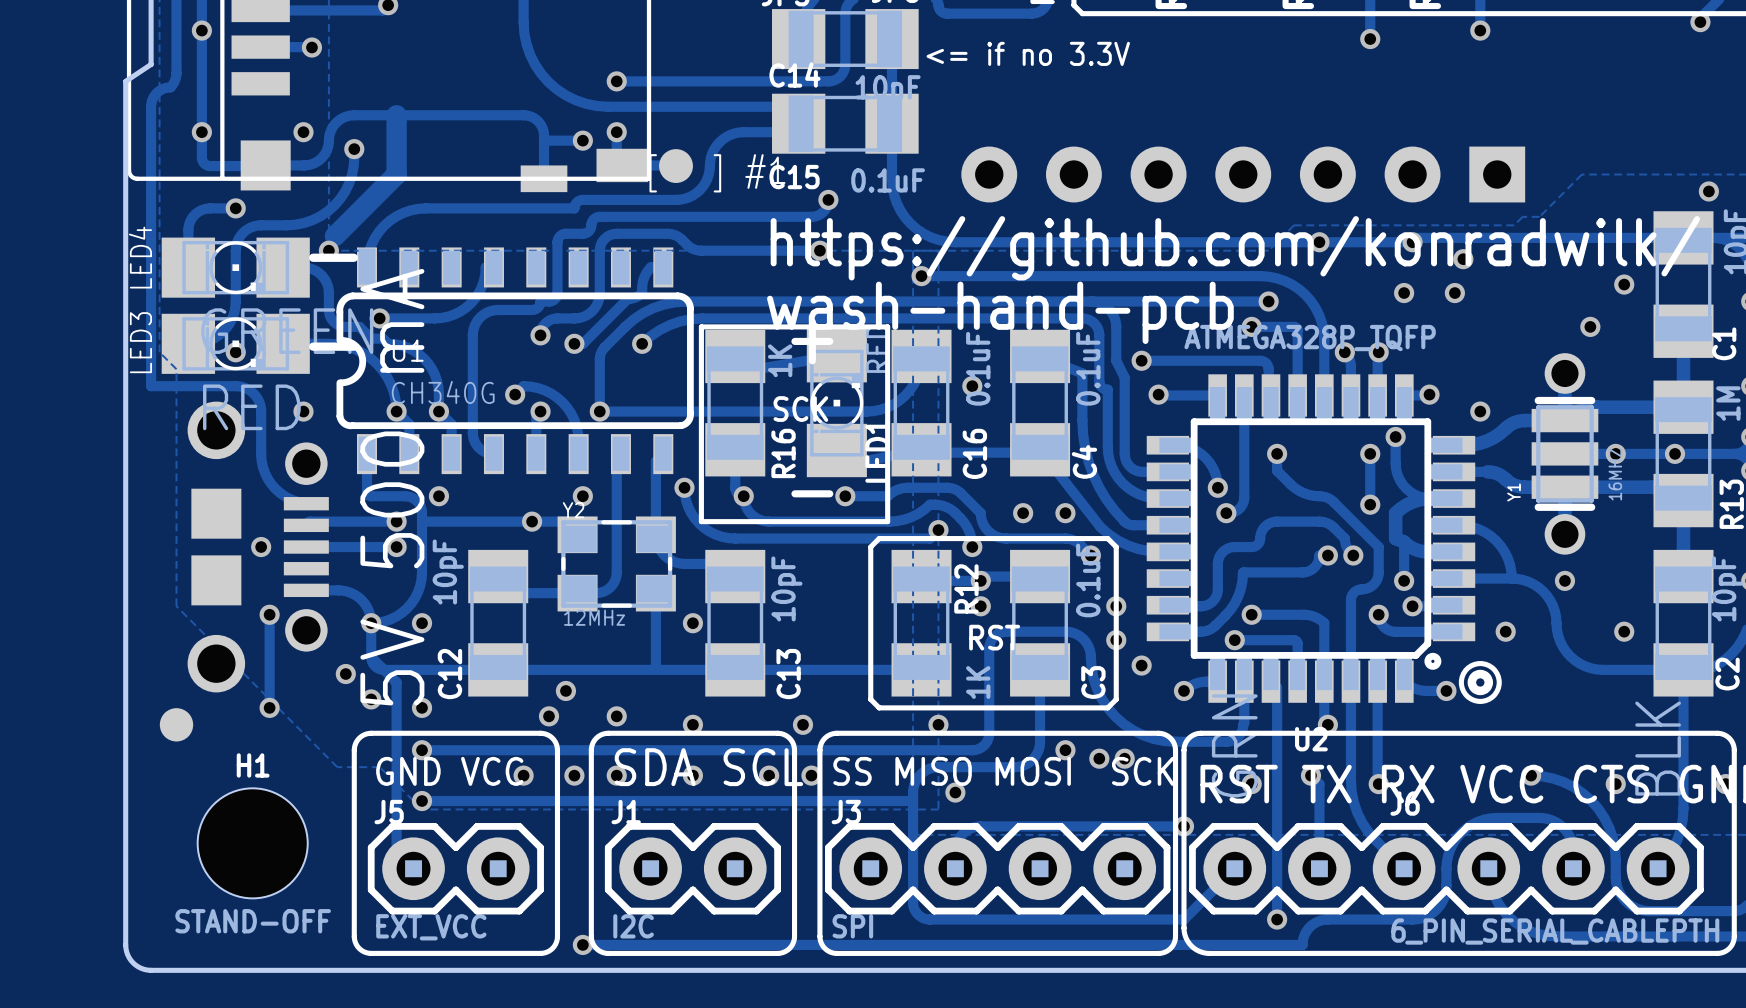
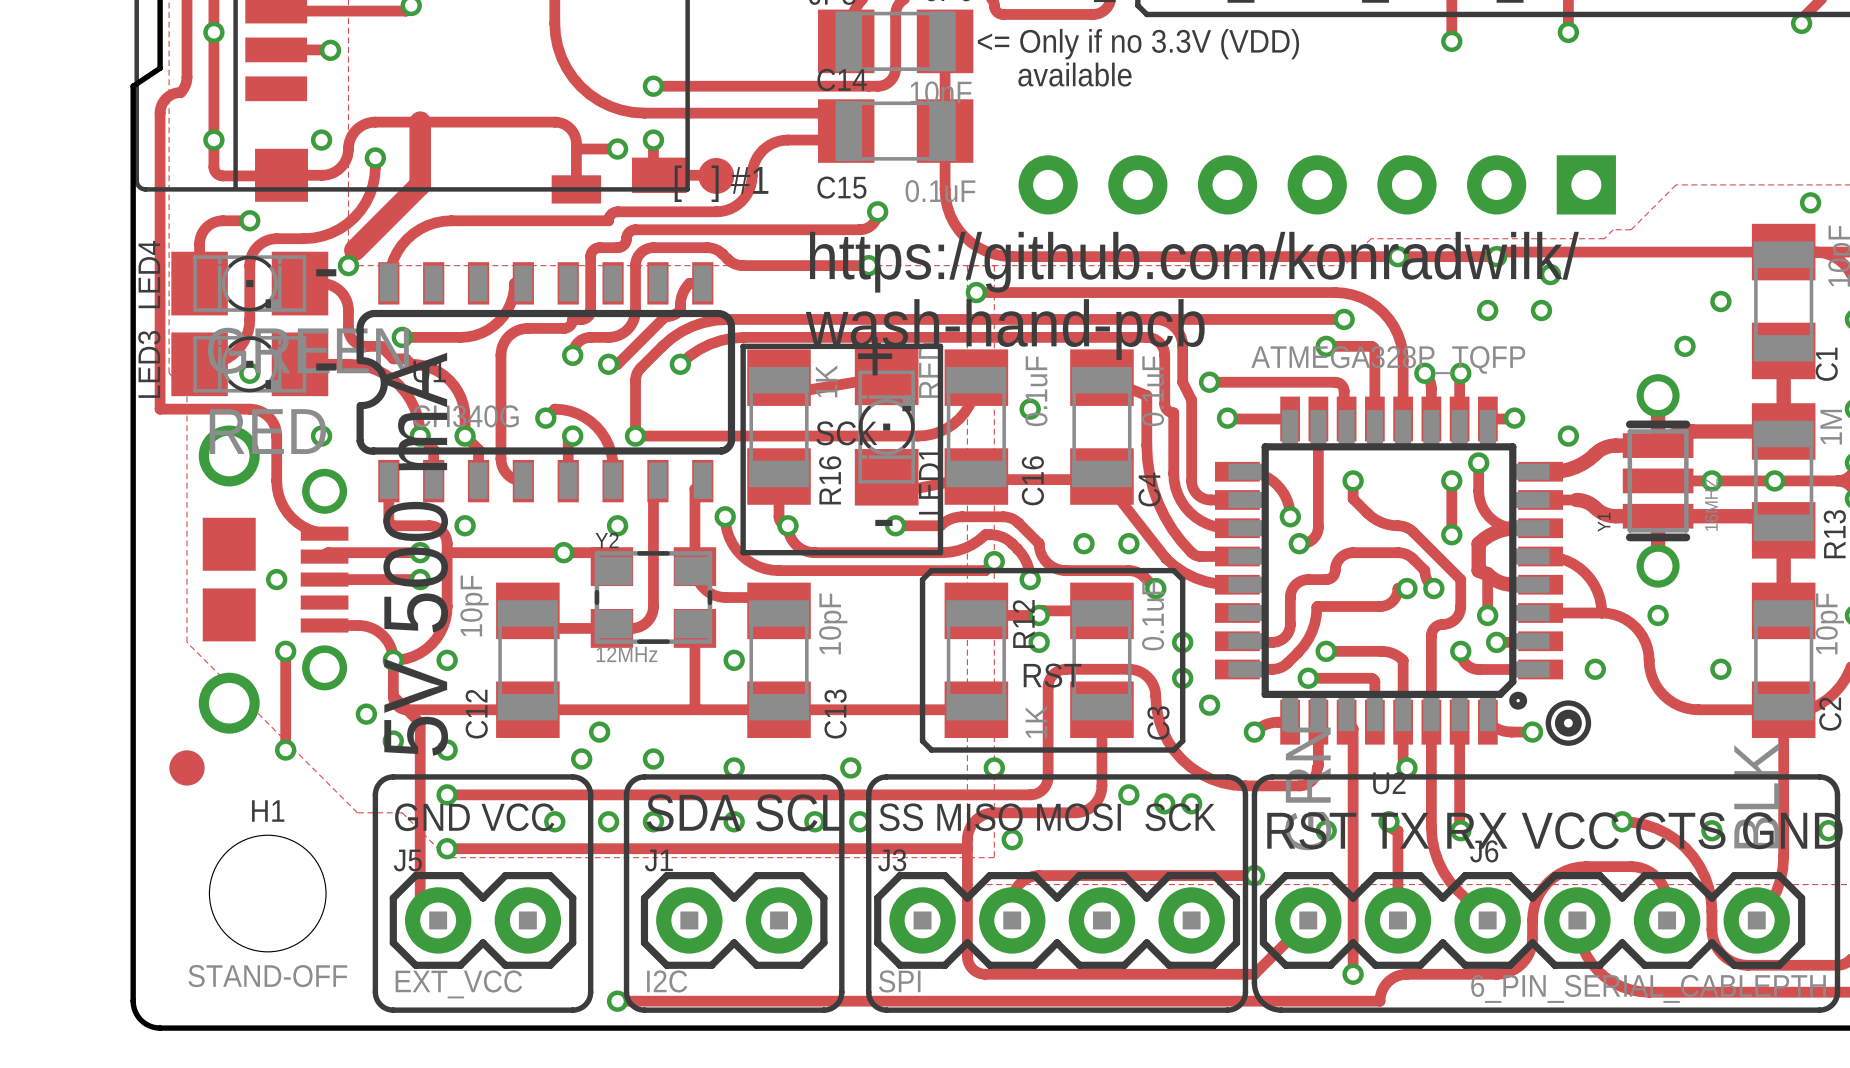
text: <= if no 3.3V (1028, 53) -> <= Only if no 3.3V (VDD) (1138, 44)
text: none -> available (1074, 74)

